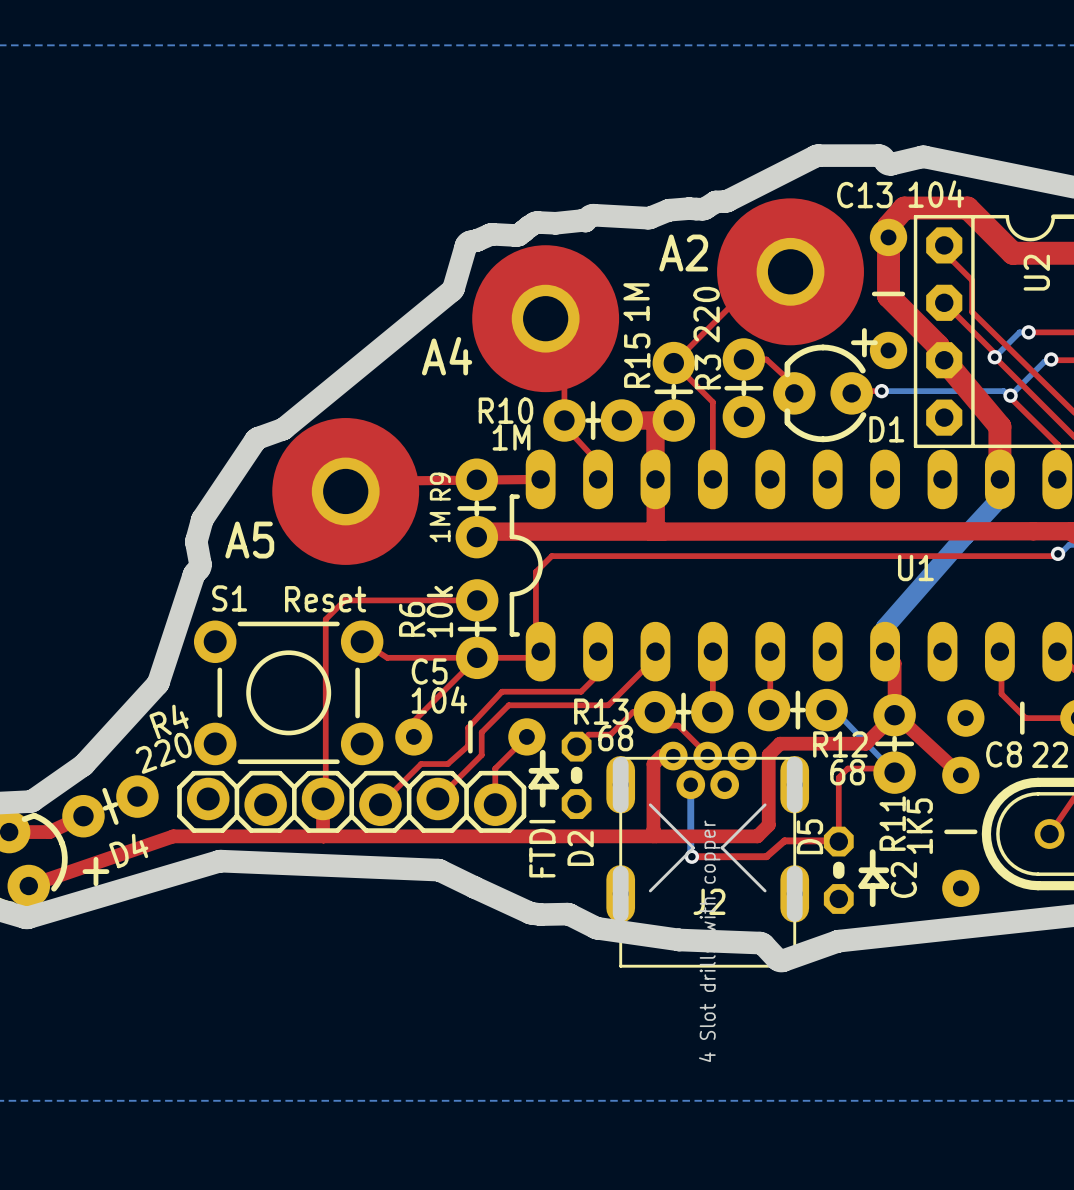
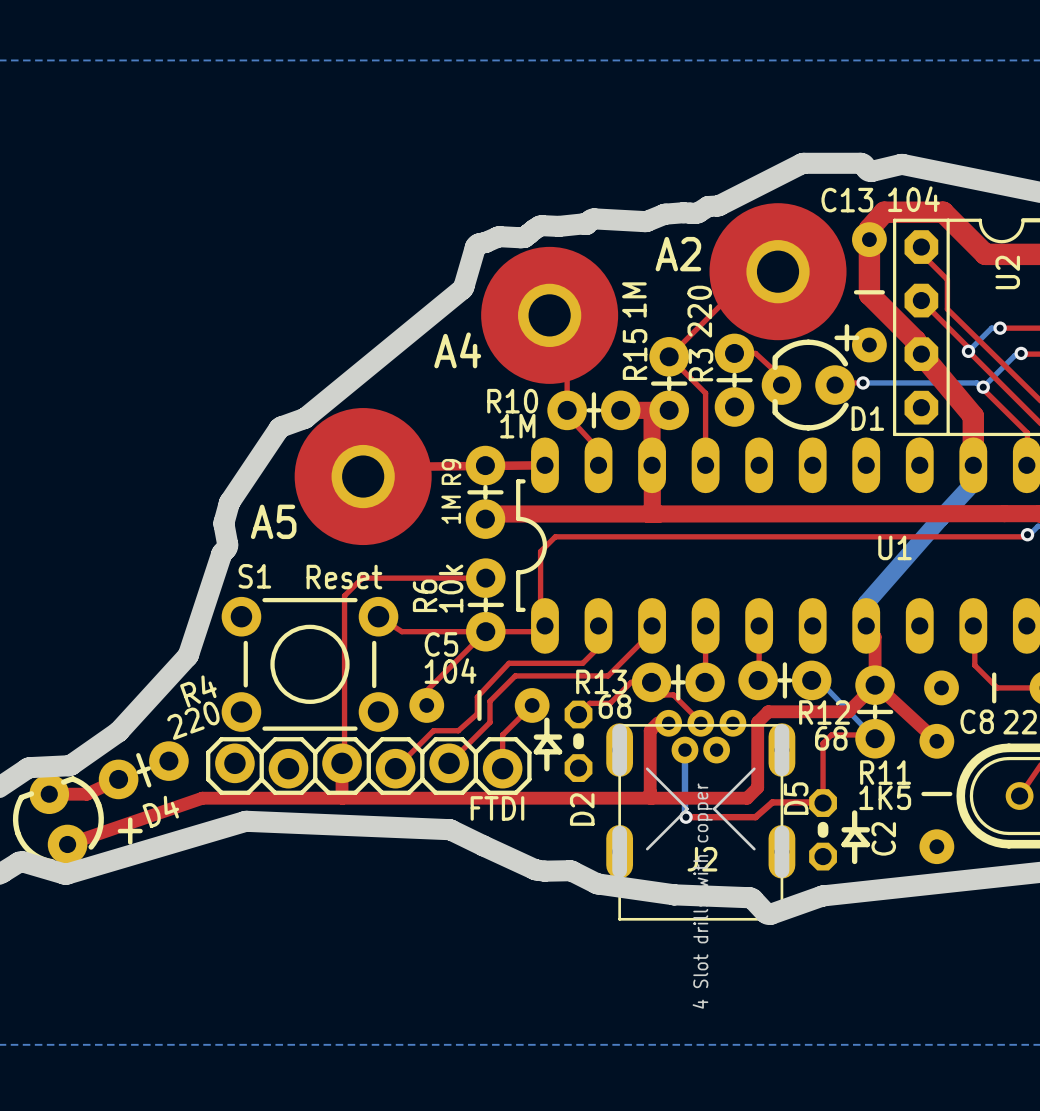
R11 name rotation: 0° (892, 823) -> 90° clockwise (885, 772)
R11 value rotation: 0° (919, 826) -> 90° clockwise (885, 797)
FTDI name rotation: 0° (542, 848) -> 90° clockwise (497, 808)

